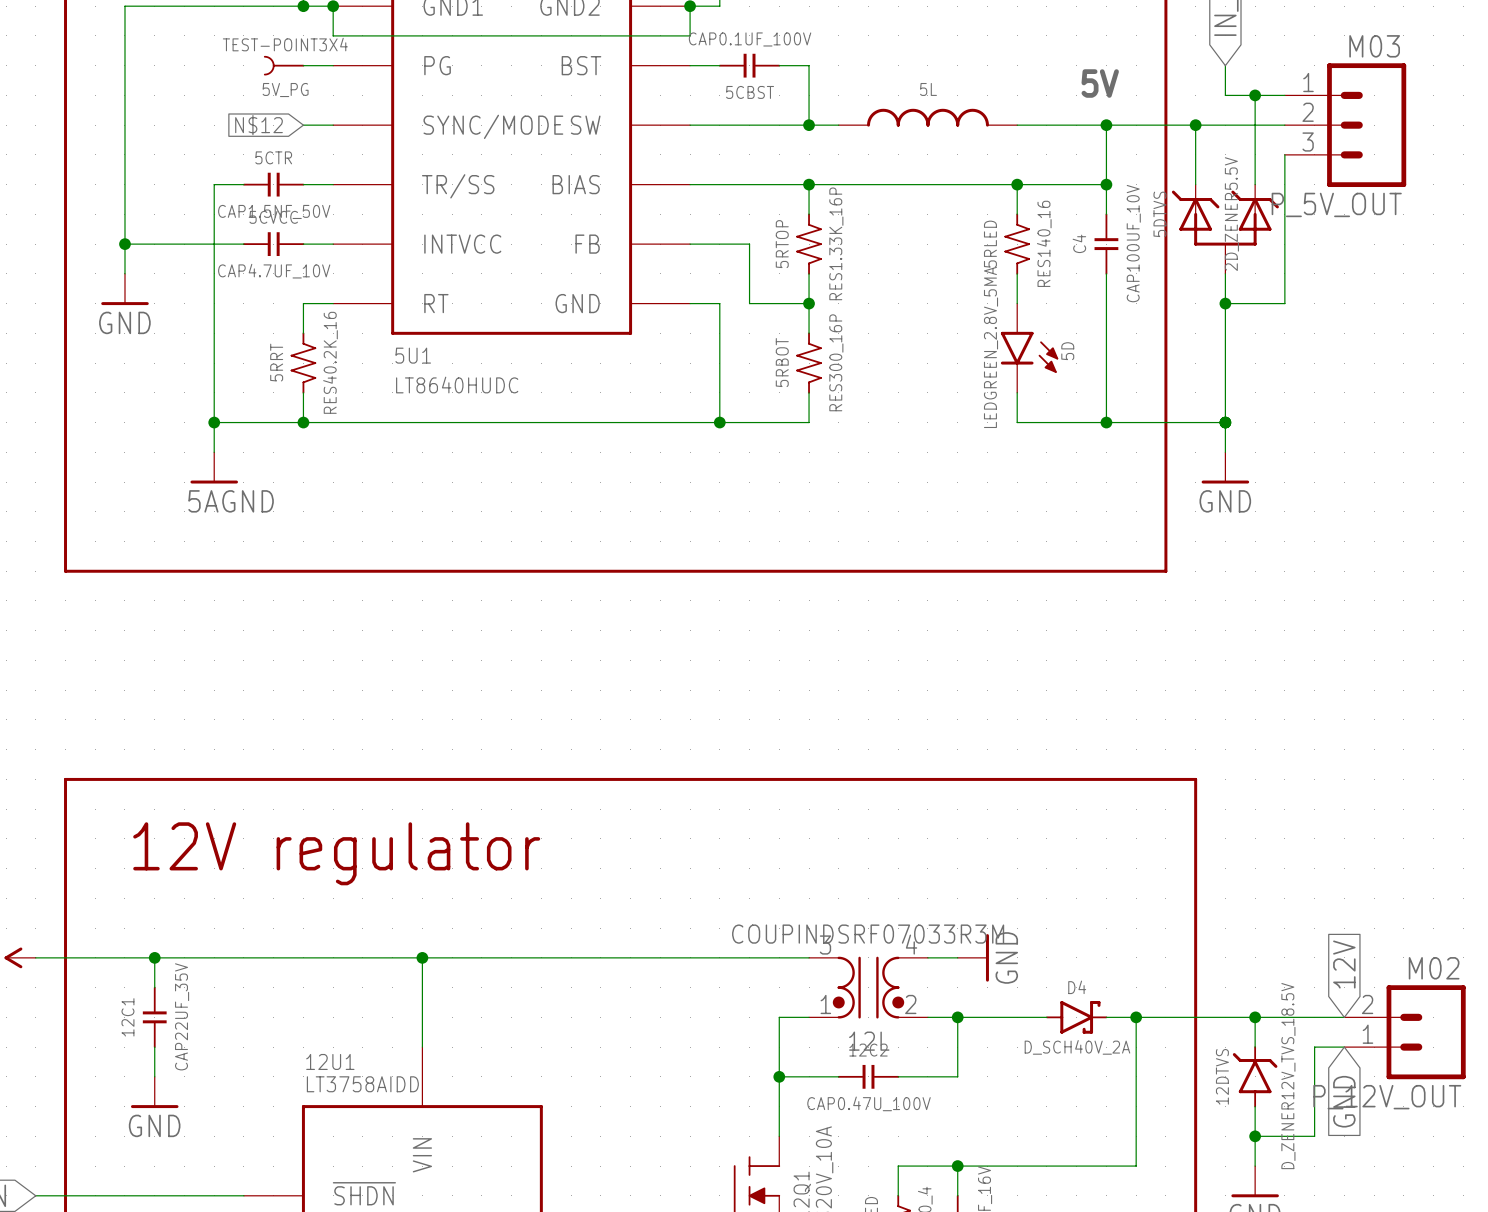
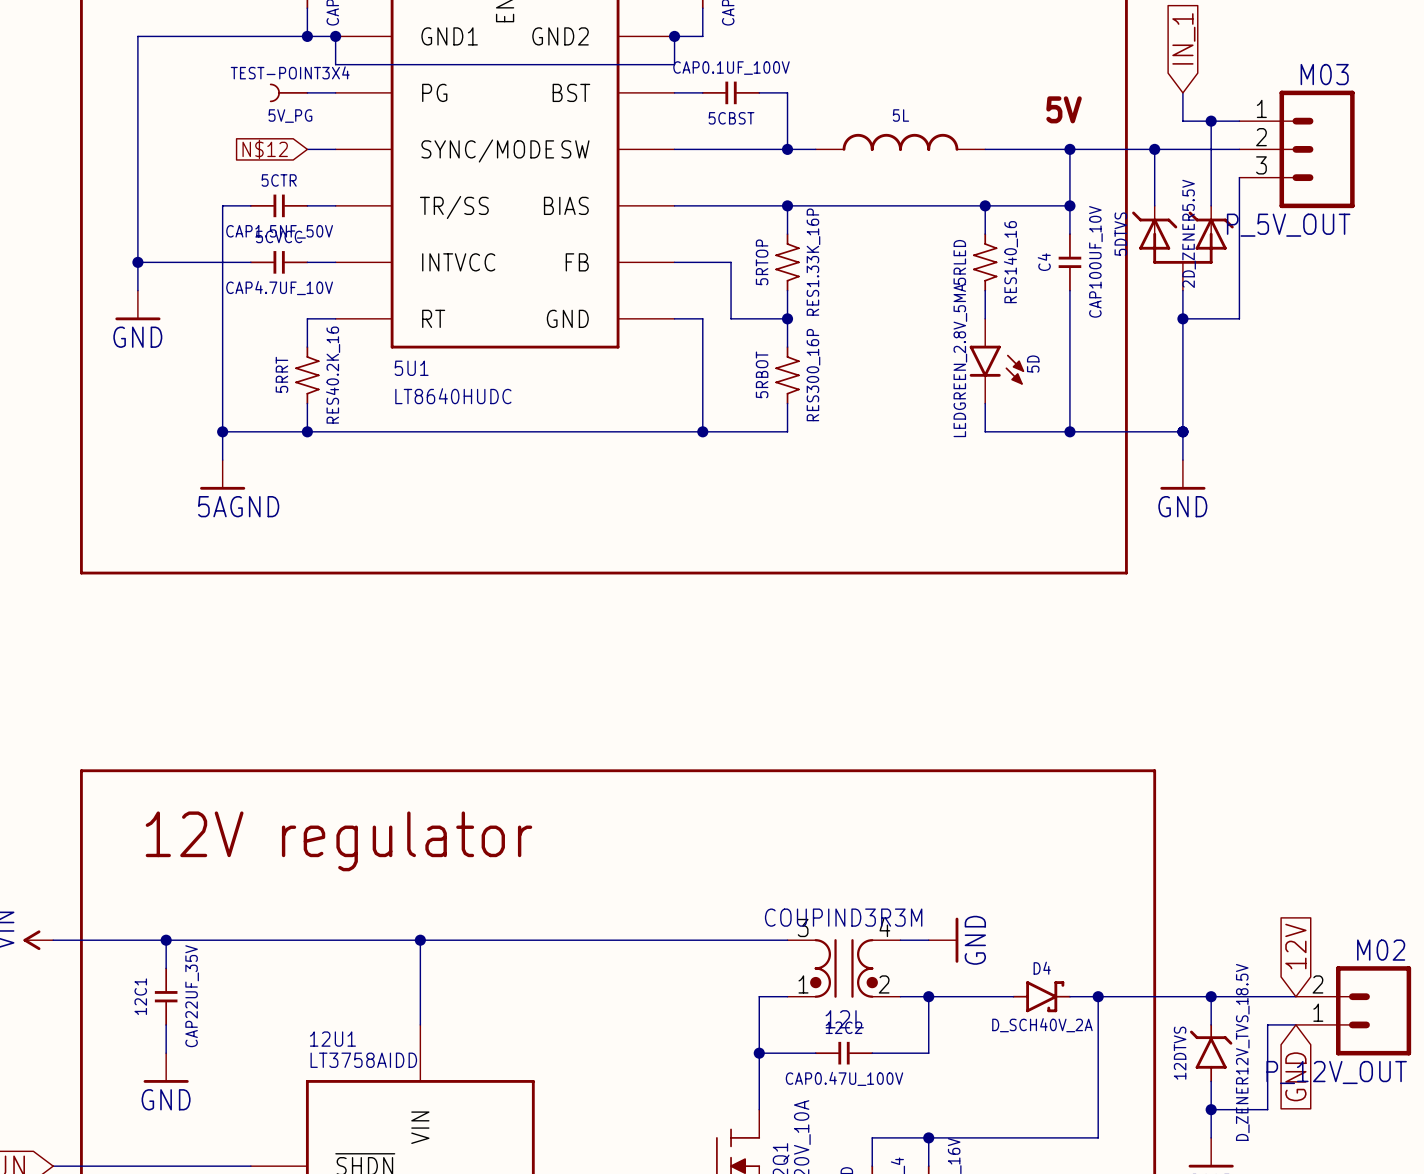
12L value: COUPINDSRF07033R3M (868, 934) -> COUPIND3R3M (843, 917)

